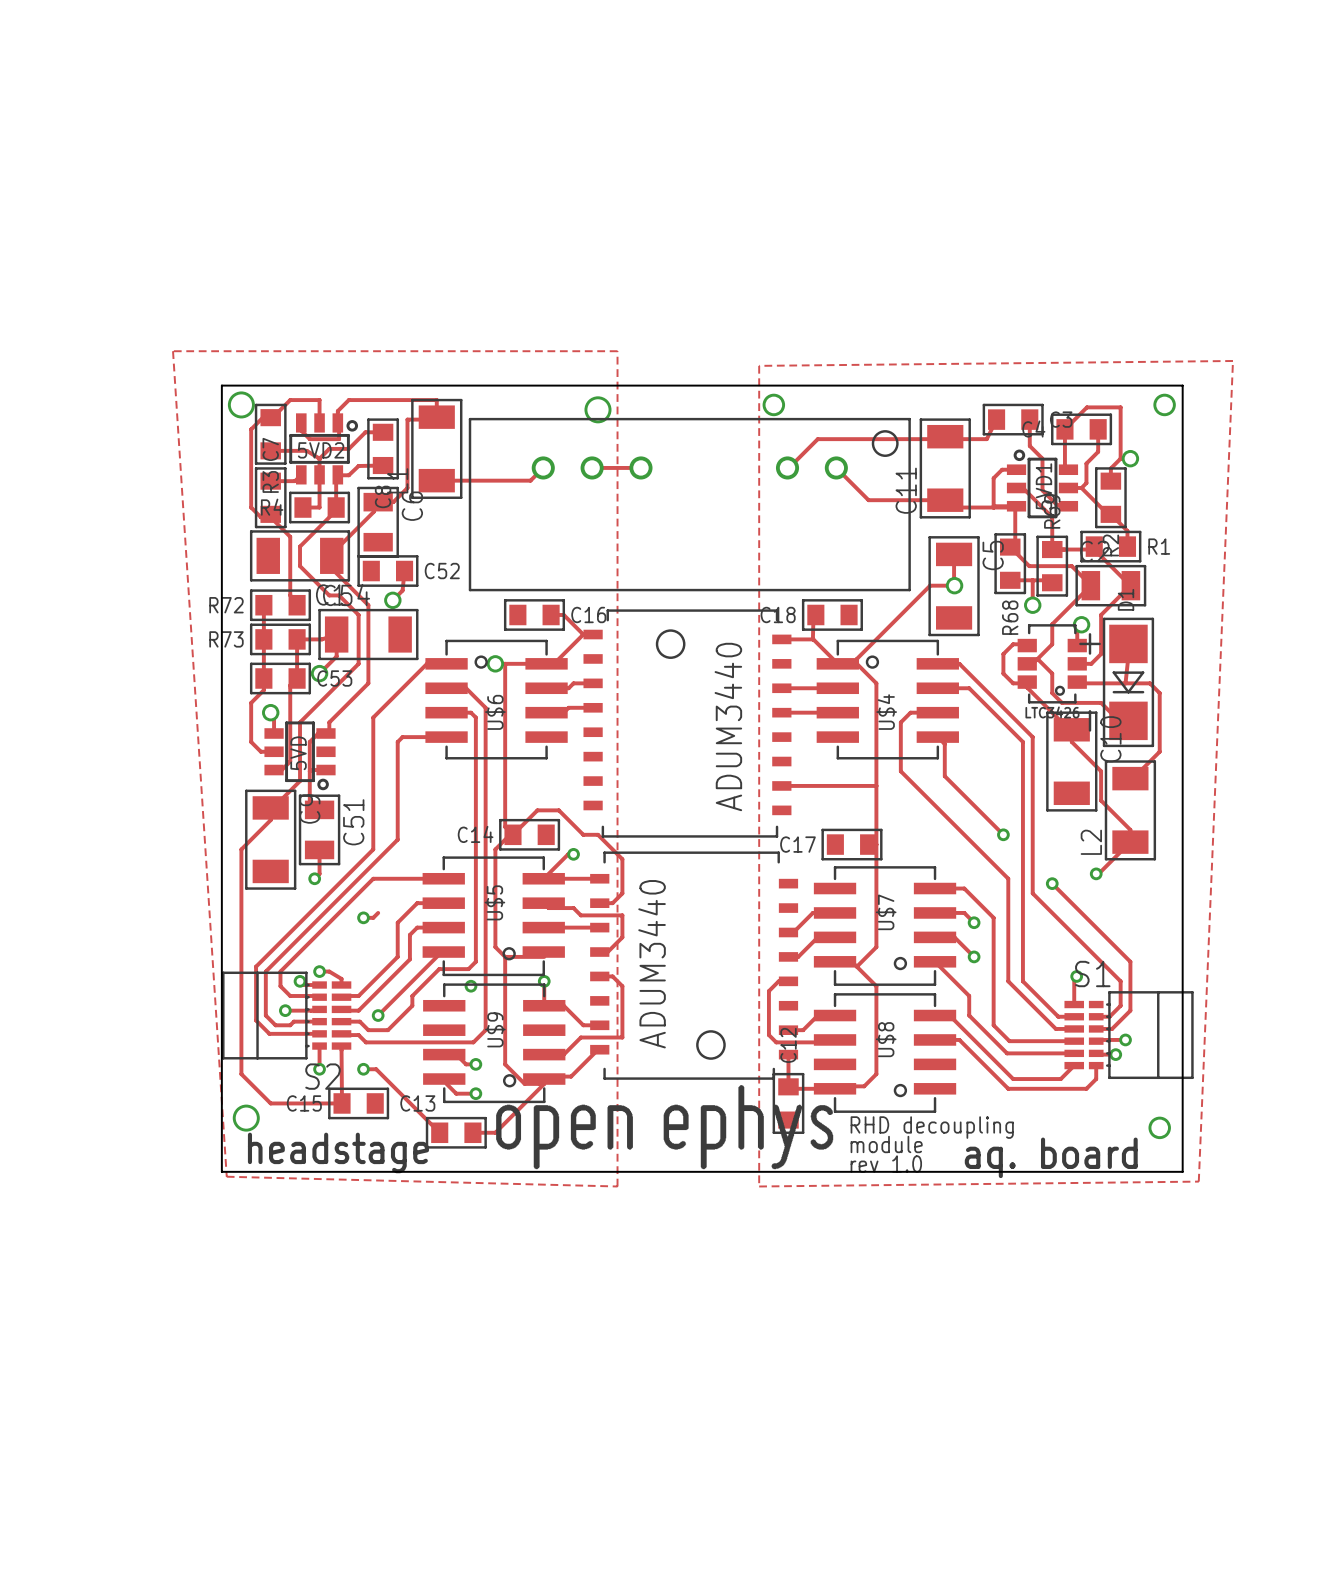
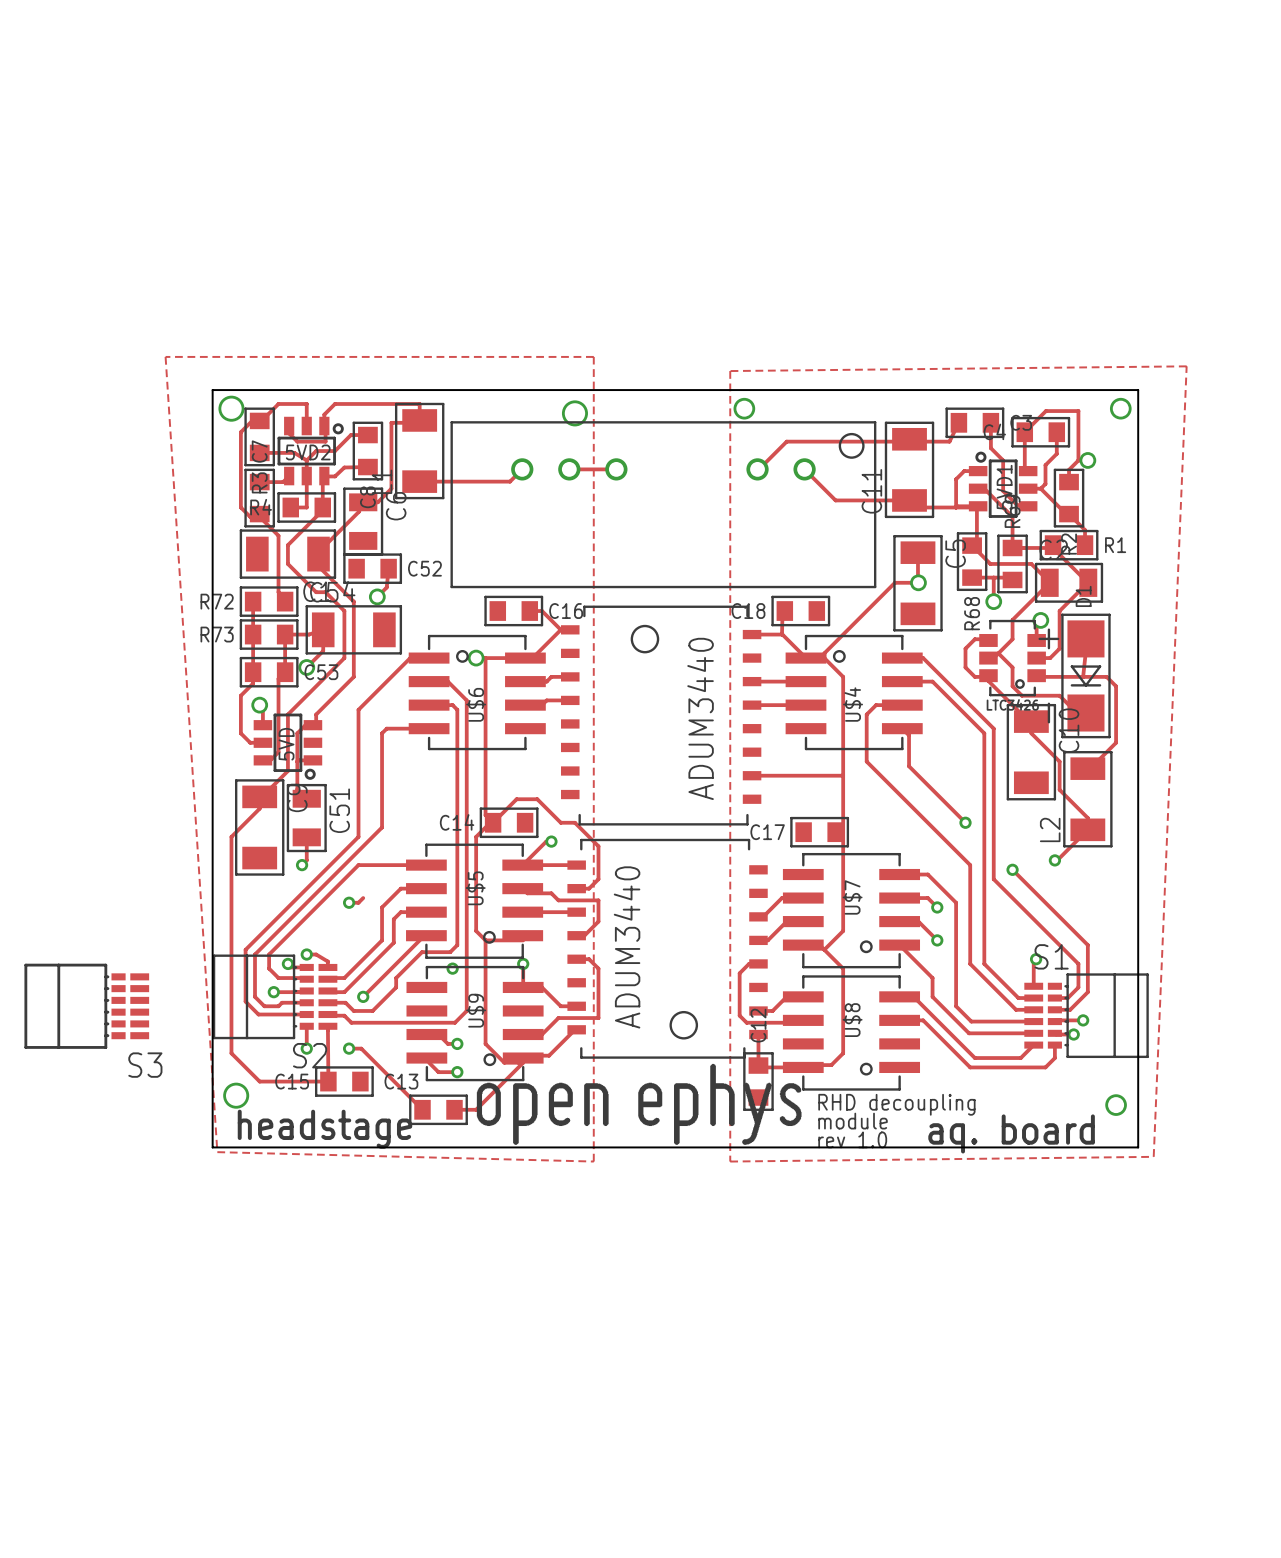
S3: none -> (86, 1006)

